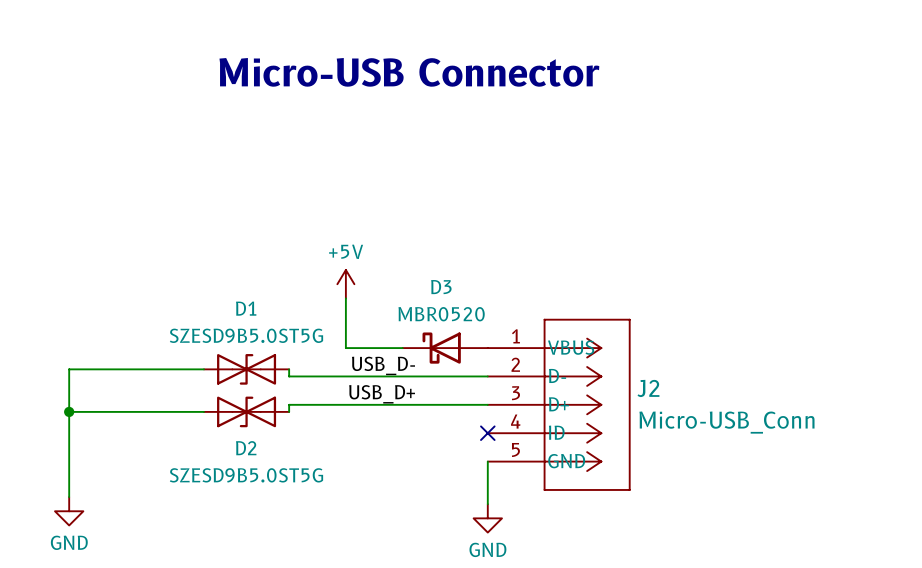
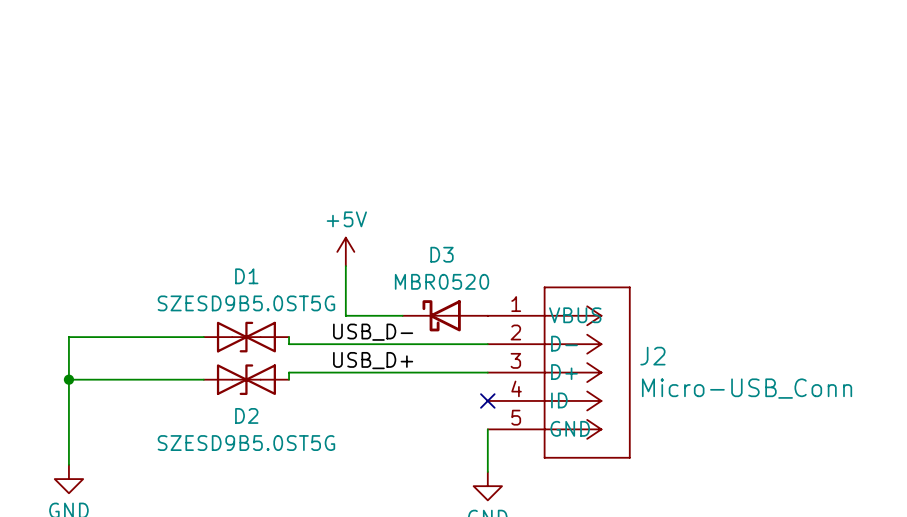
text: Micro-USB Connector (409, 72) -> none

